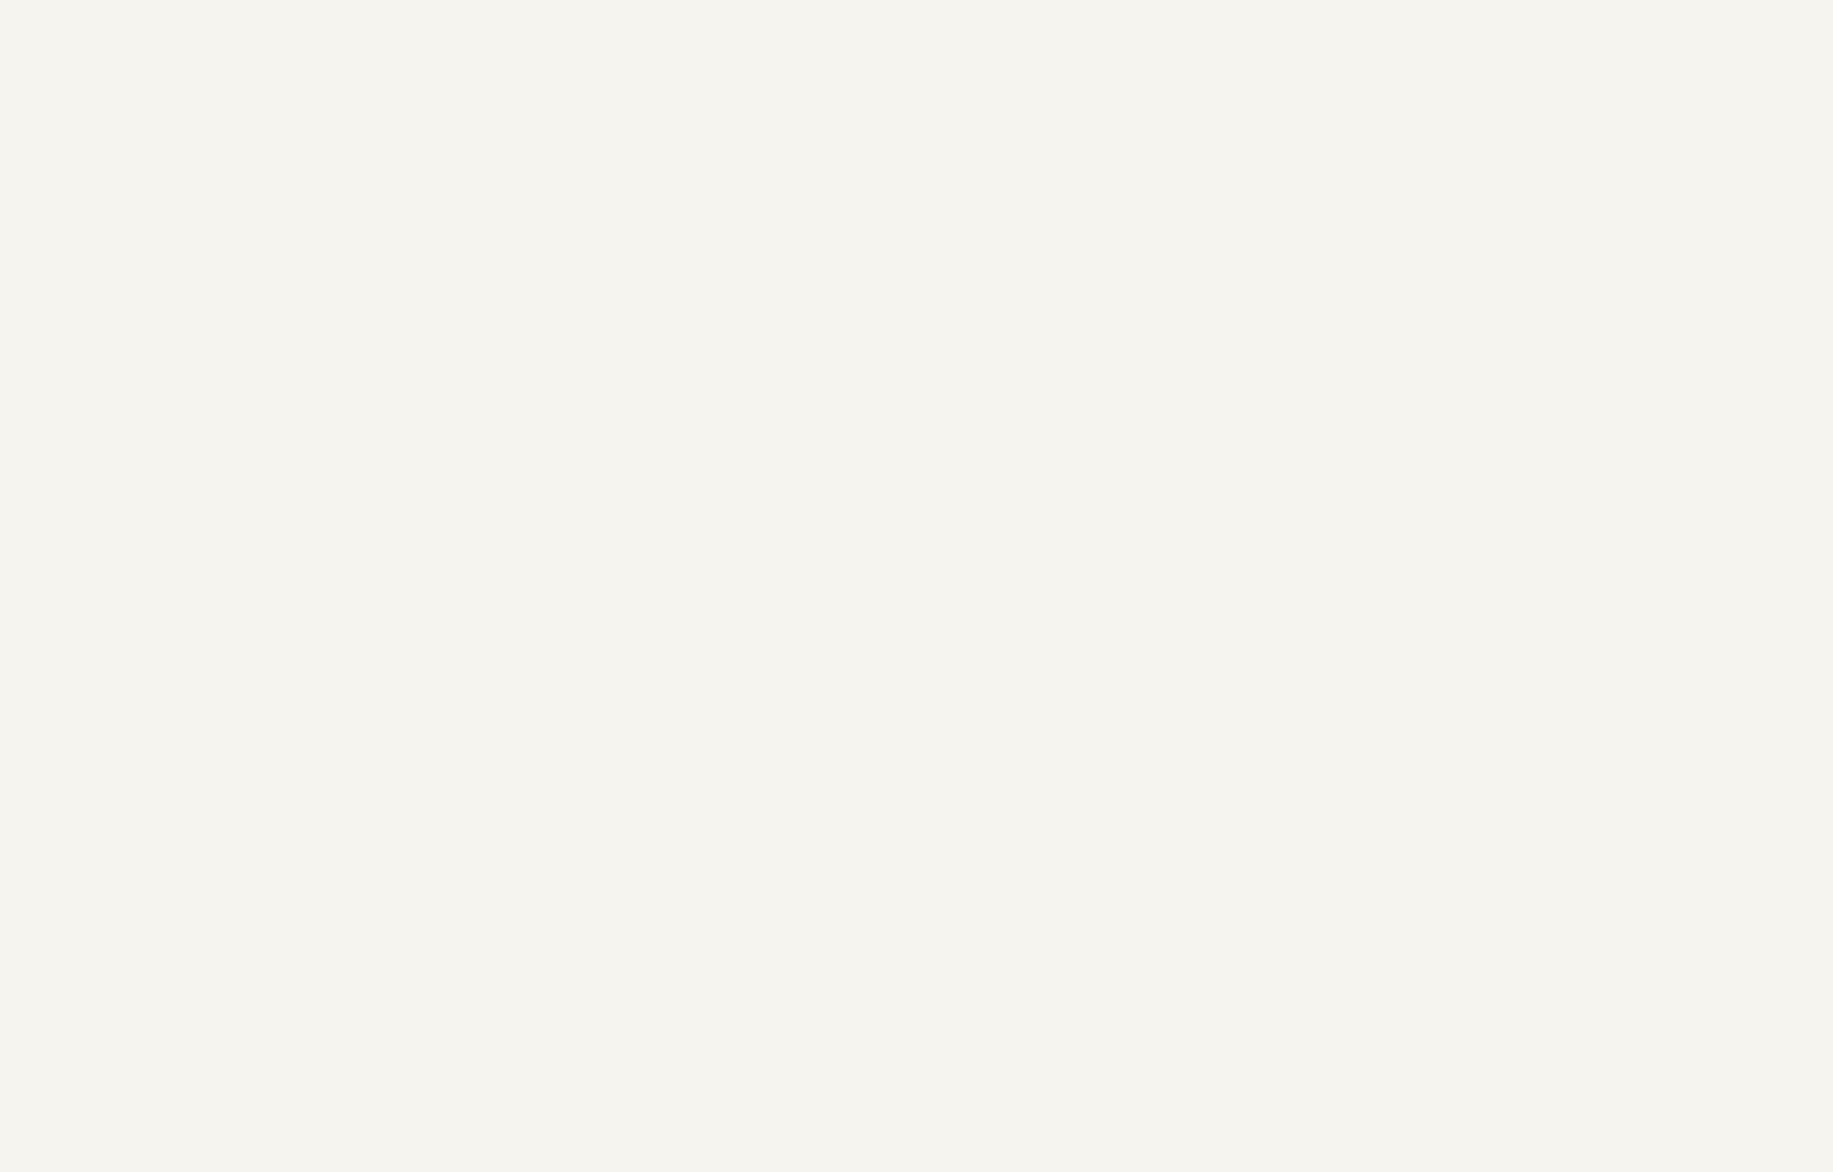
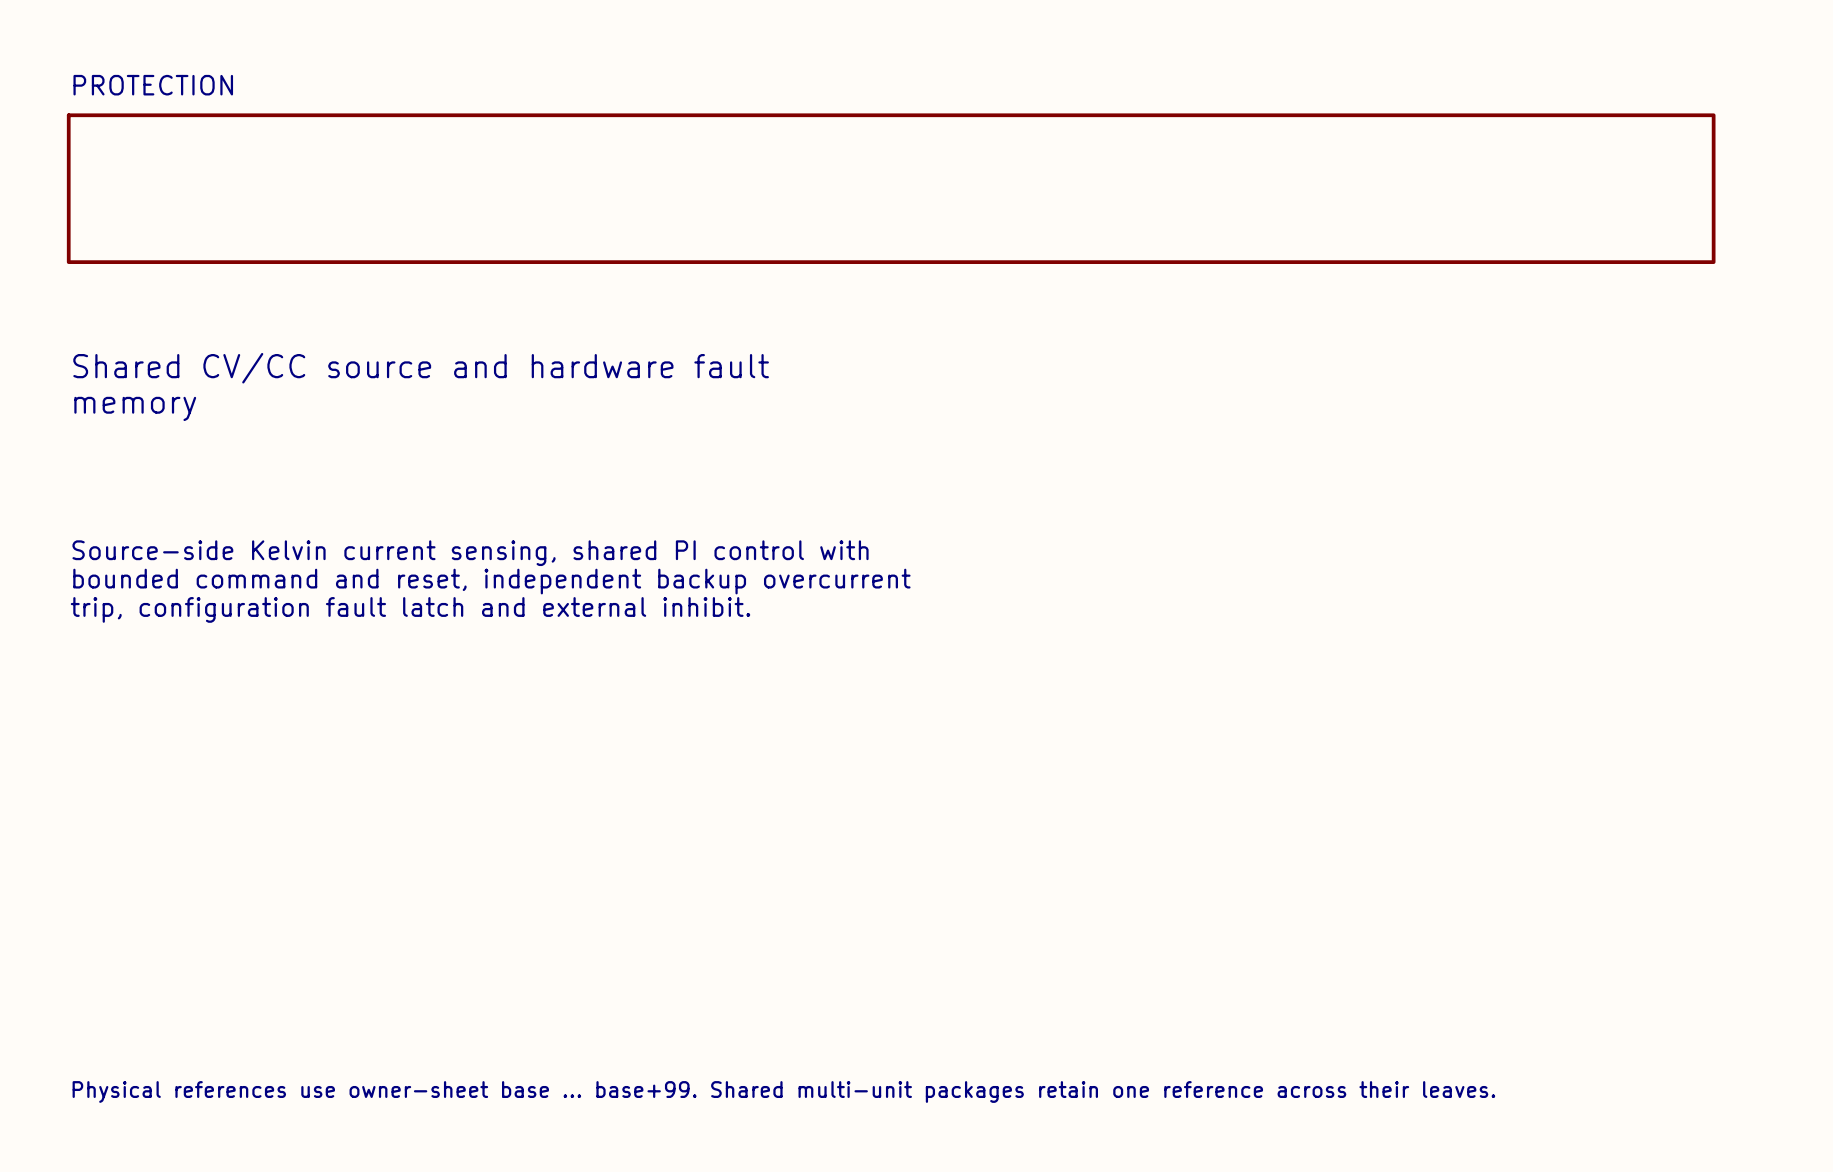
sheet PROTECTION: none -> (891, 188)
text: none -> Shared CV/CC source and hardware fault (421, 368)
text: none -> memory (135, 408)
text: none -> Source-side Kelvin current sensing, shared PI control with (470, 553)
text: none -> bounded command and reset, independent backup overcurrent (491, 581)
text: none -> trip, configuration fault latch and external inhibit. (410, 609)
text: none -> Physical references use owner-sheet base ... base+99. Shared multi-unit packages retain one reference across their leaves. (783, 1091)

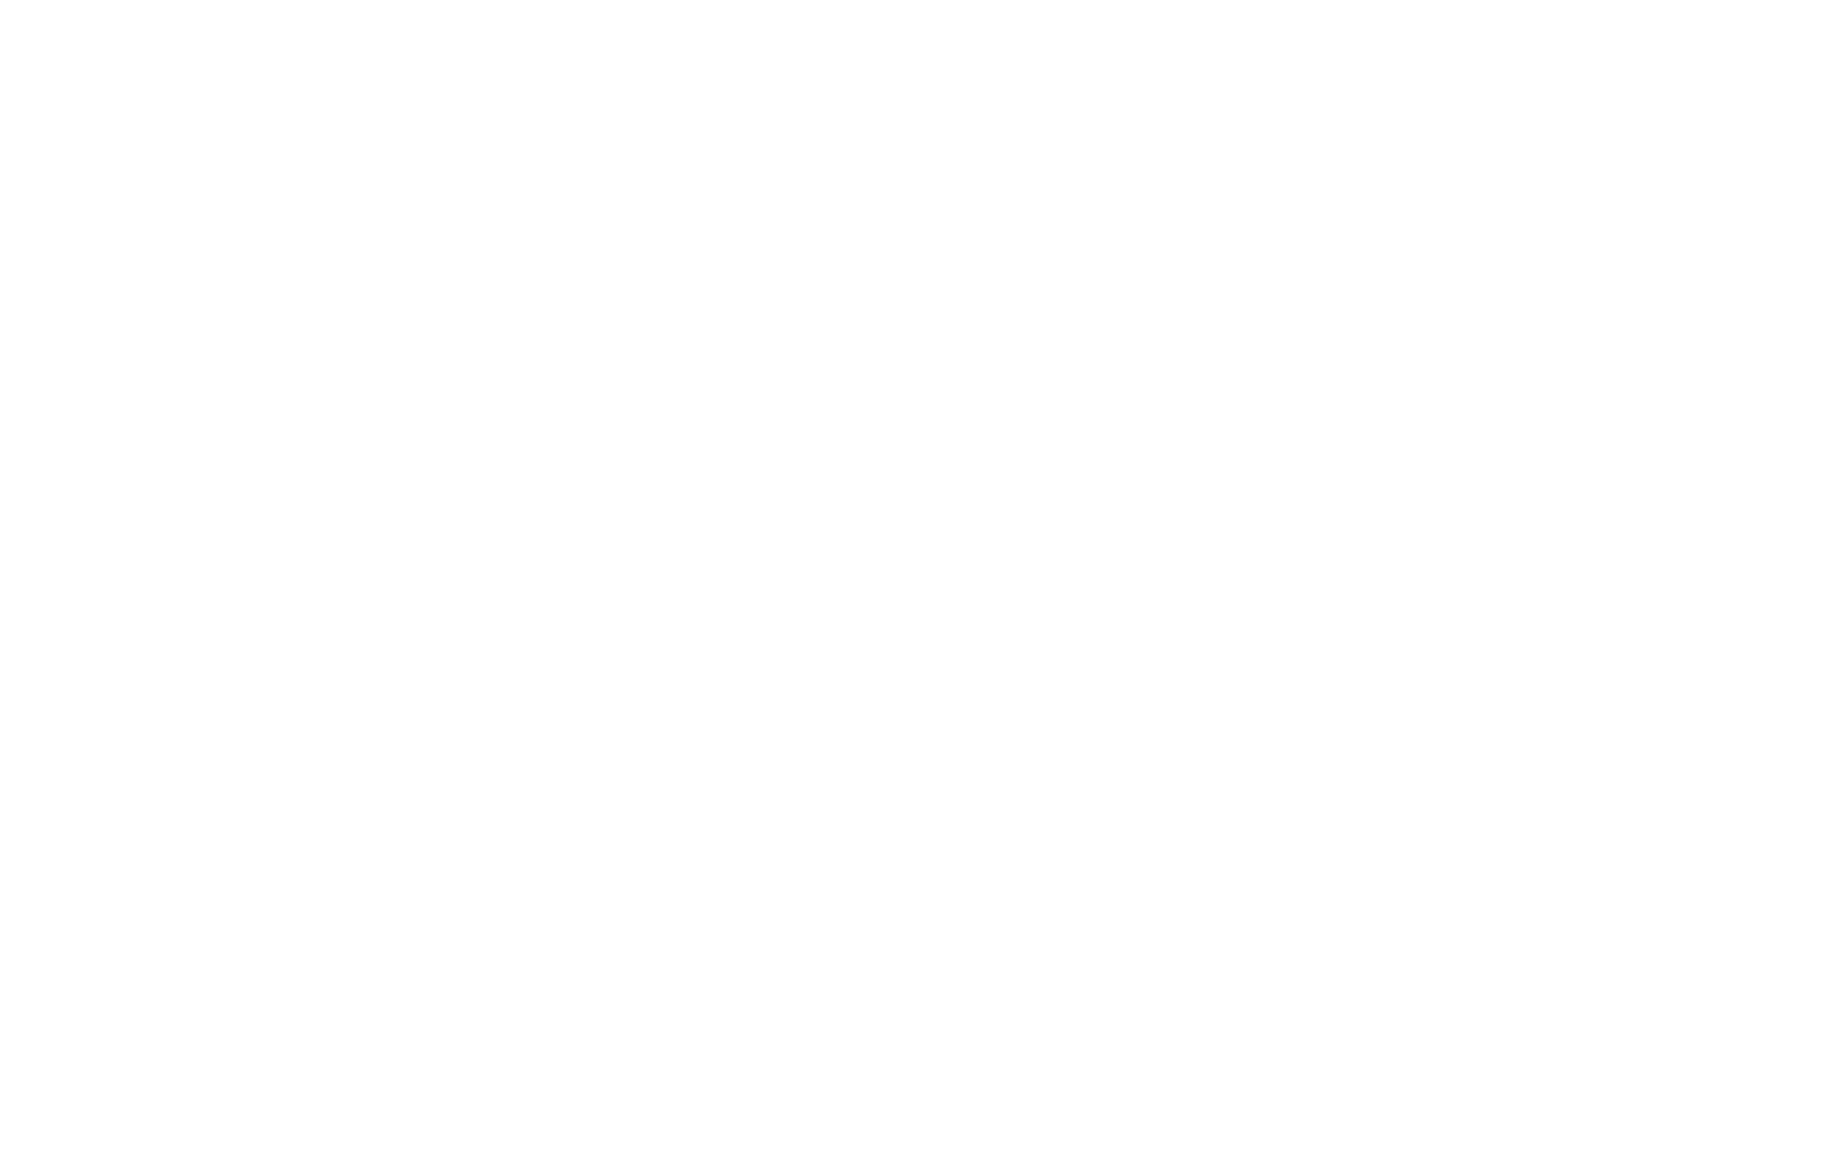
sheet PROTECTION: (891, 188) -> none
text: Shared CV/CC source and hardware fault (421, 368) -> none
text: memory (135, 408) -> none
text: Source-side Kelvin current sensing, shared PI control with (470, 553) -> none
text: bounded command and reset, independent backup overcurrent (491, 581) -> none
text: trip, configuration fault latch and external inhibit. (410, 609) -> none
text: Physical references use owner-sheet base ... base+99. Shared multi-unit packages retain one reference across their leaves. (783, 1091) -> none

